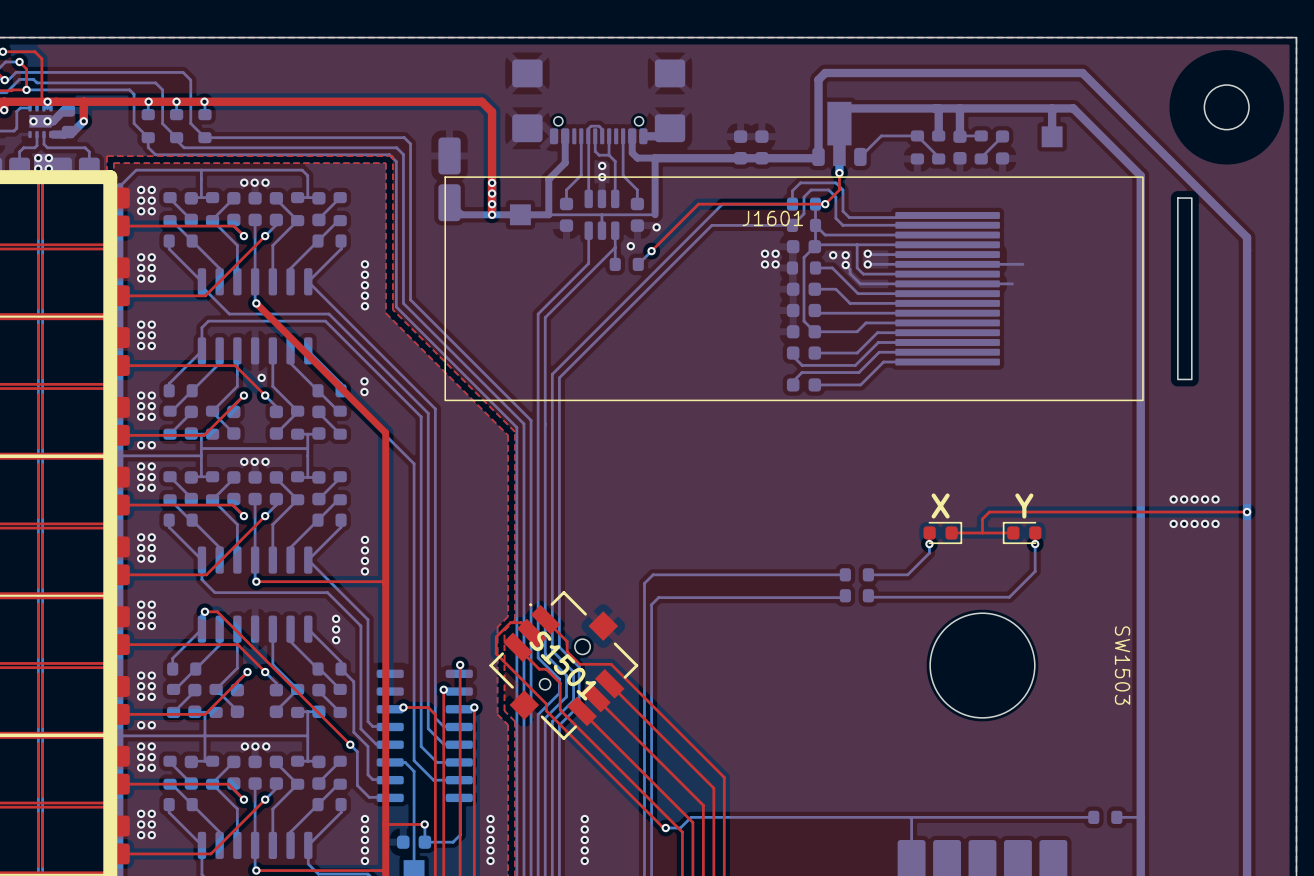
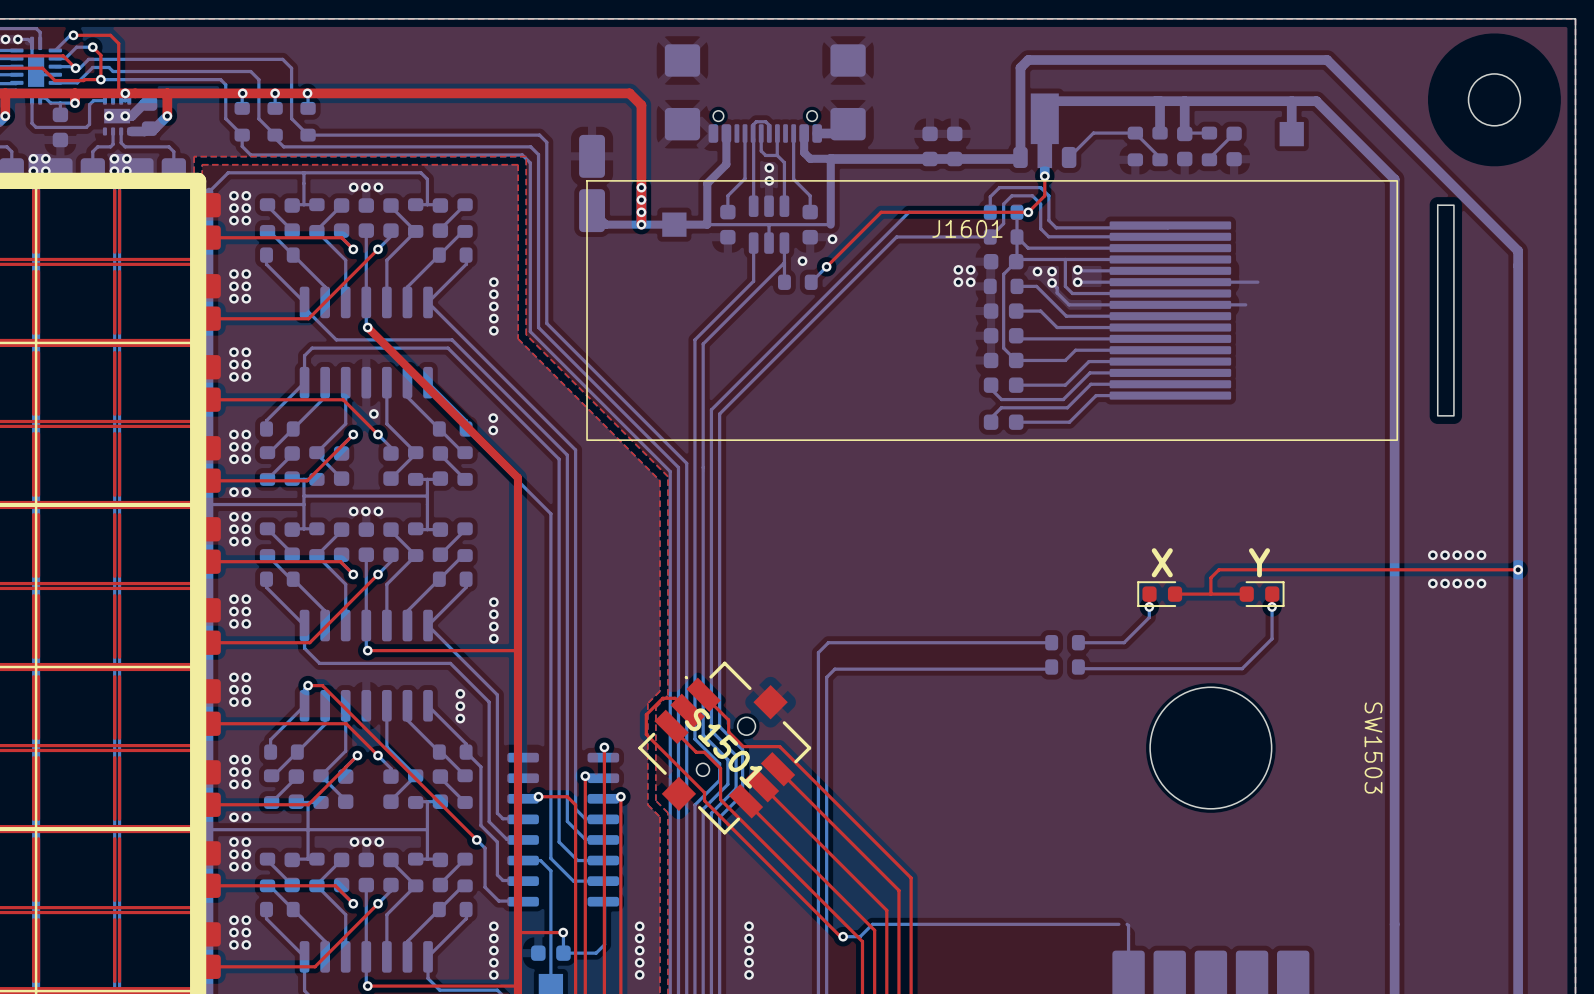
part rotation: 0° (942, 532) -> 180° (1159, 594)
part rotation: 0° (1022, 532) -> 180° (1262, 594)
bottom track: (903, 817) (1093, 817) -> none
part: (1105, 817) -> none
bottom track: (1116, 817) (1140, 817) -> none

